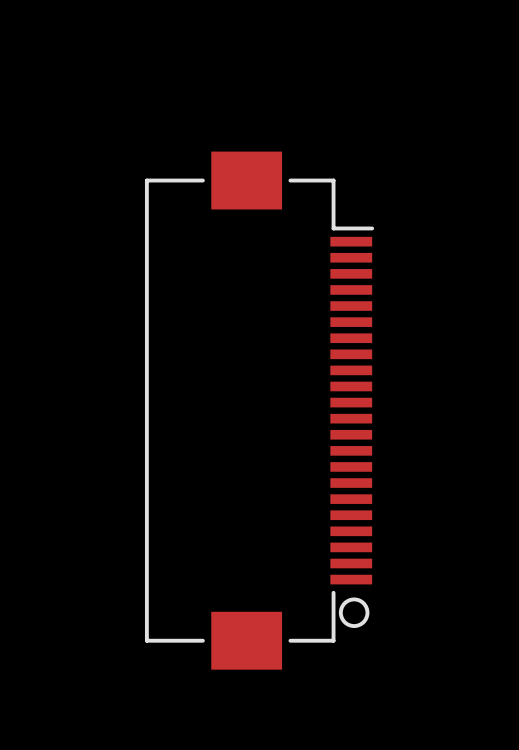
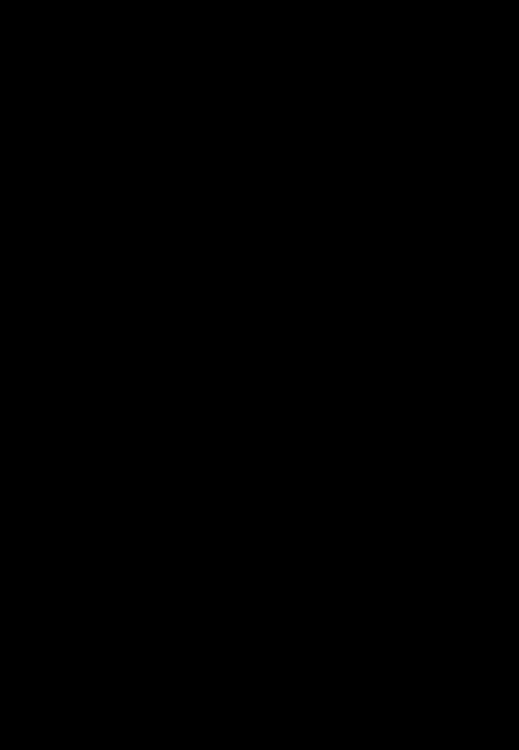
part: (259, 410) -> none

